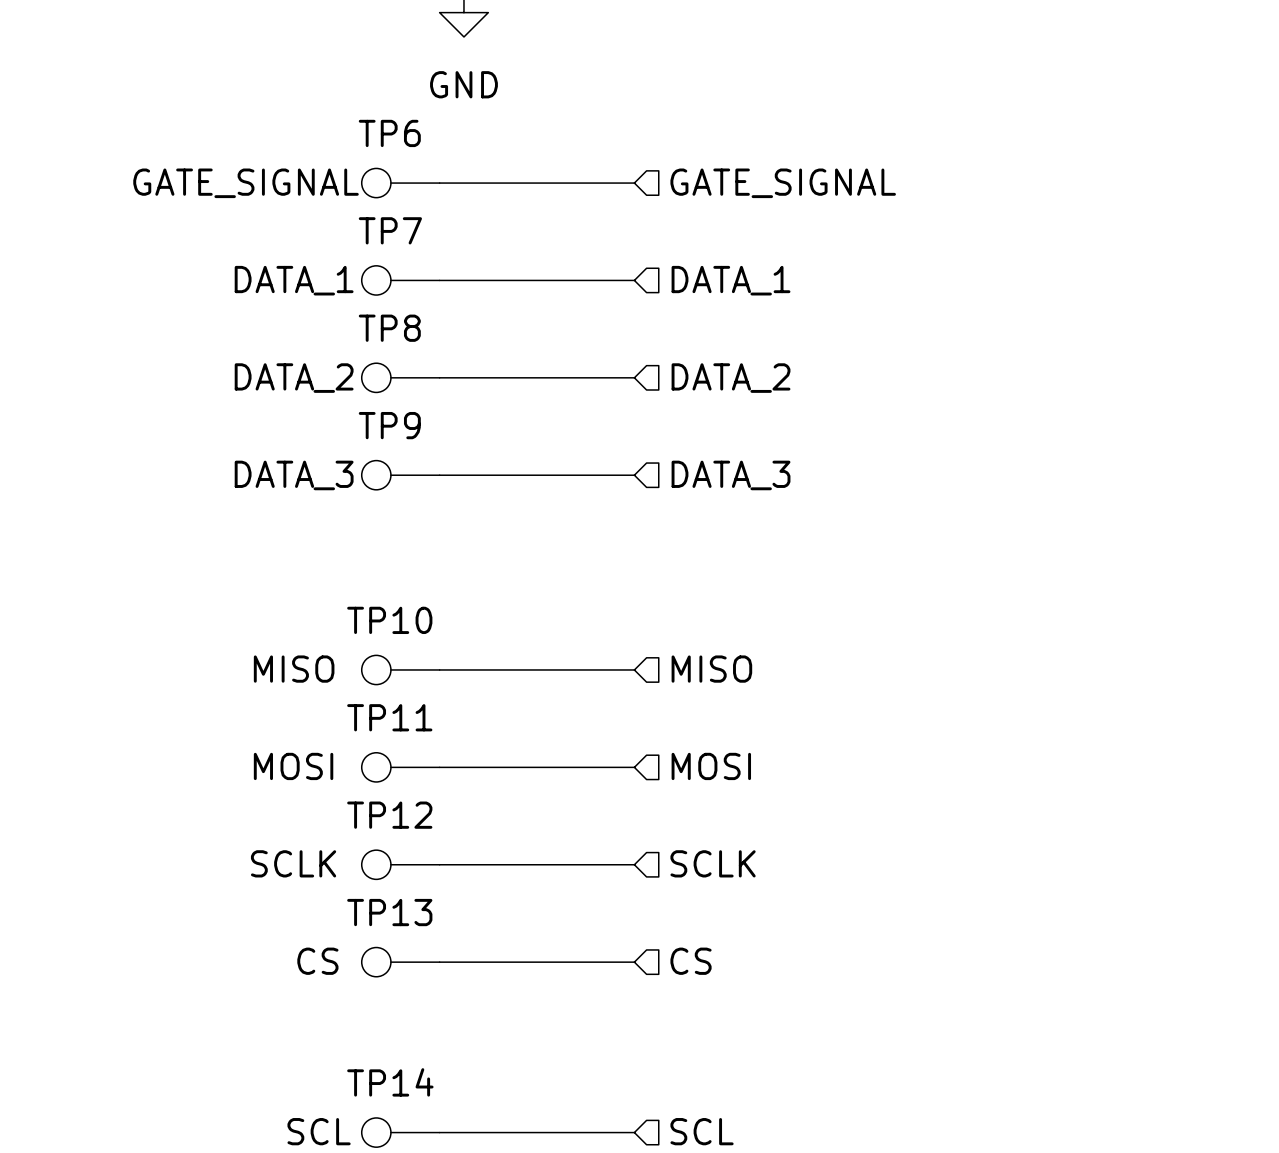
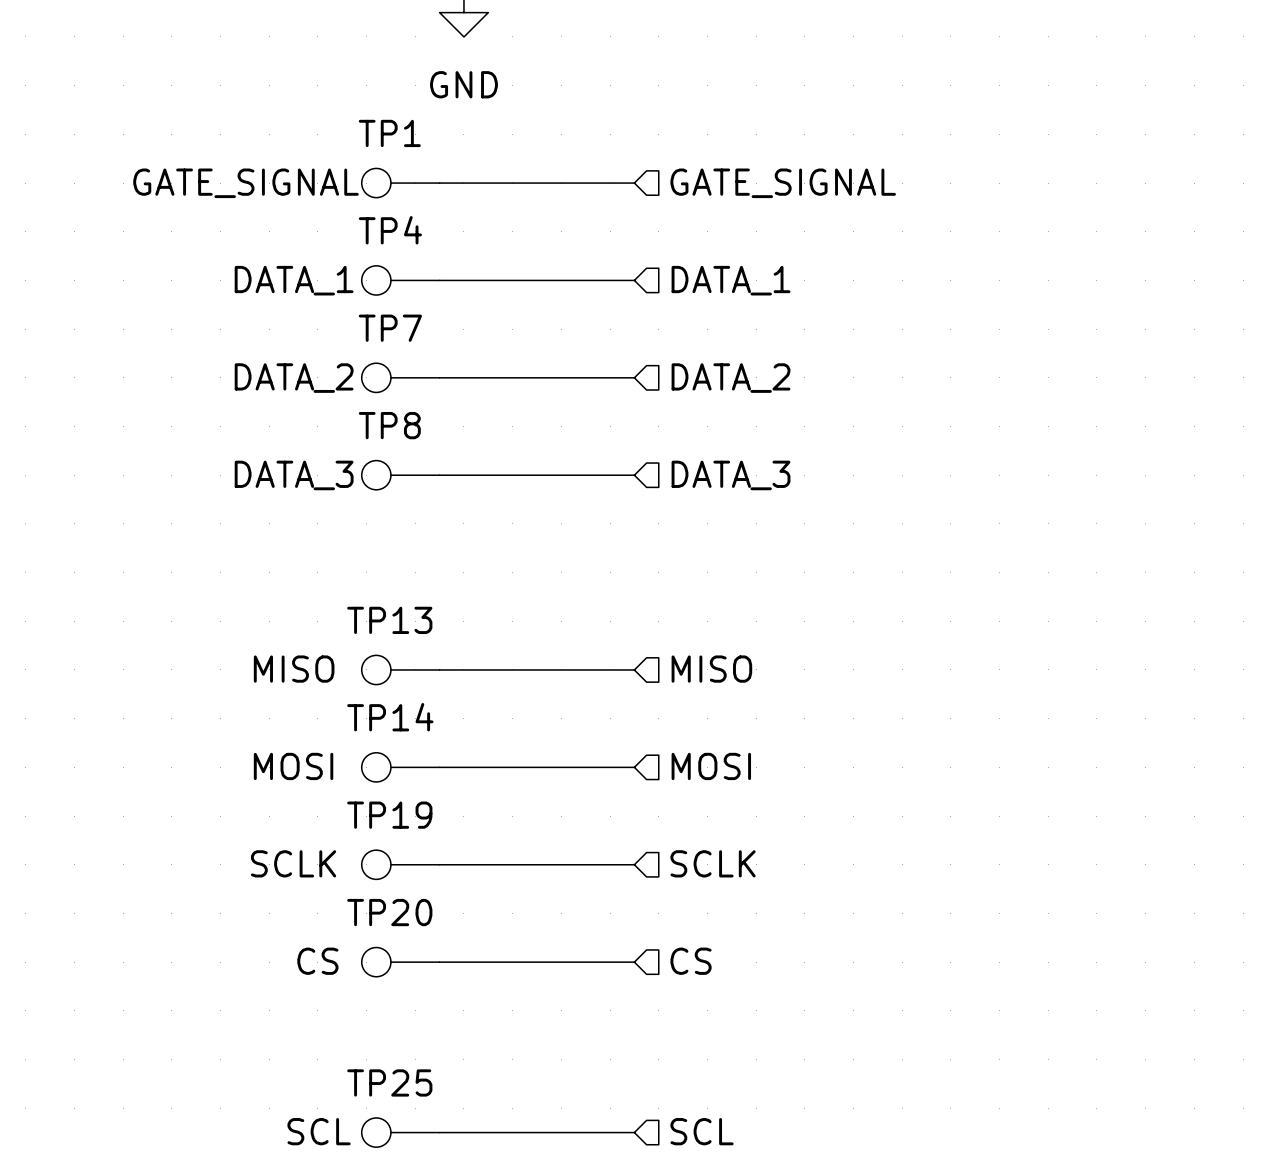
TP6 name: TP6 (389, 133) -> TP1 (389, 133)
TP7 name: TP7 (390, 230) -> TP4 (390, 230)
TP8 name: TP8 (389, 328) -> TP7 (390, 328)
TP9 name: TP9 (389, 425) -> TP8 (389, 425)
TP10 name: TP10 (389, 620) -> TP13 (389, 620)
TP11 name: TP11 (389, 717) -> TP14 (390, 717)
TP12 name: TP12 (389, 815) -> TP19 (389, 815)
TP13 name: TP13 (389, 912) -> TP20 (389, 912)
TP14 name: TP14 (390, 1082) -> TP25 (389, 1082)

